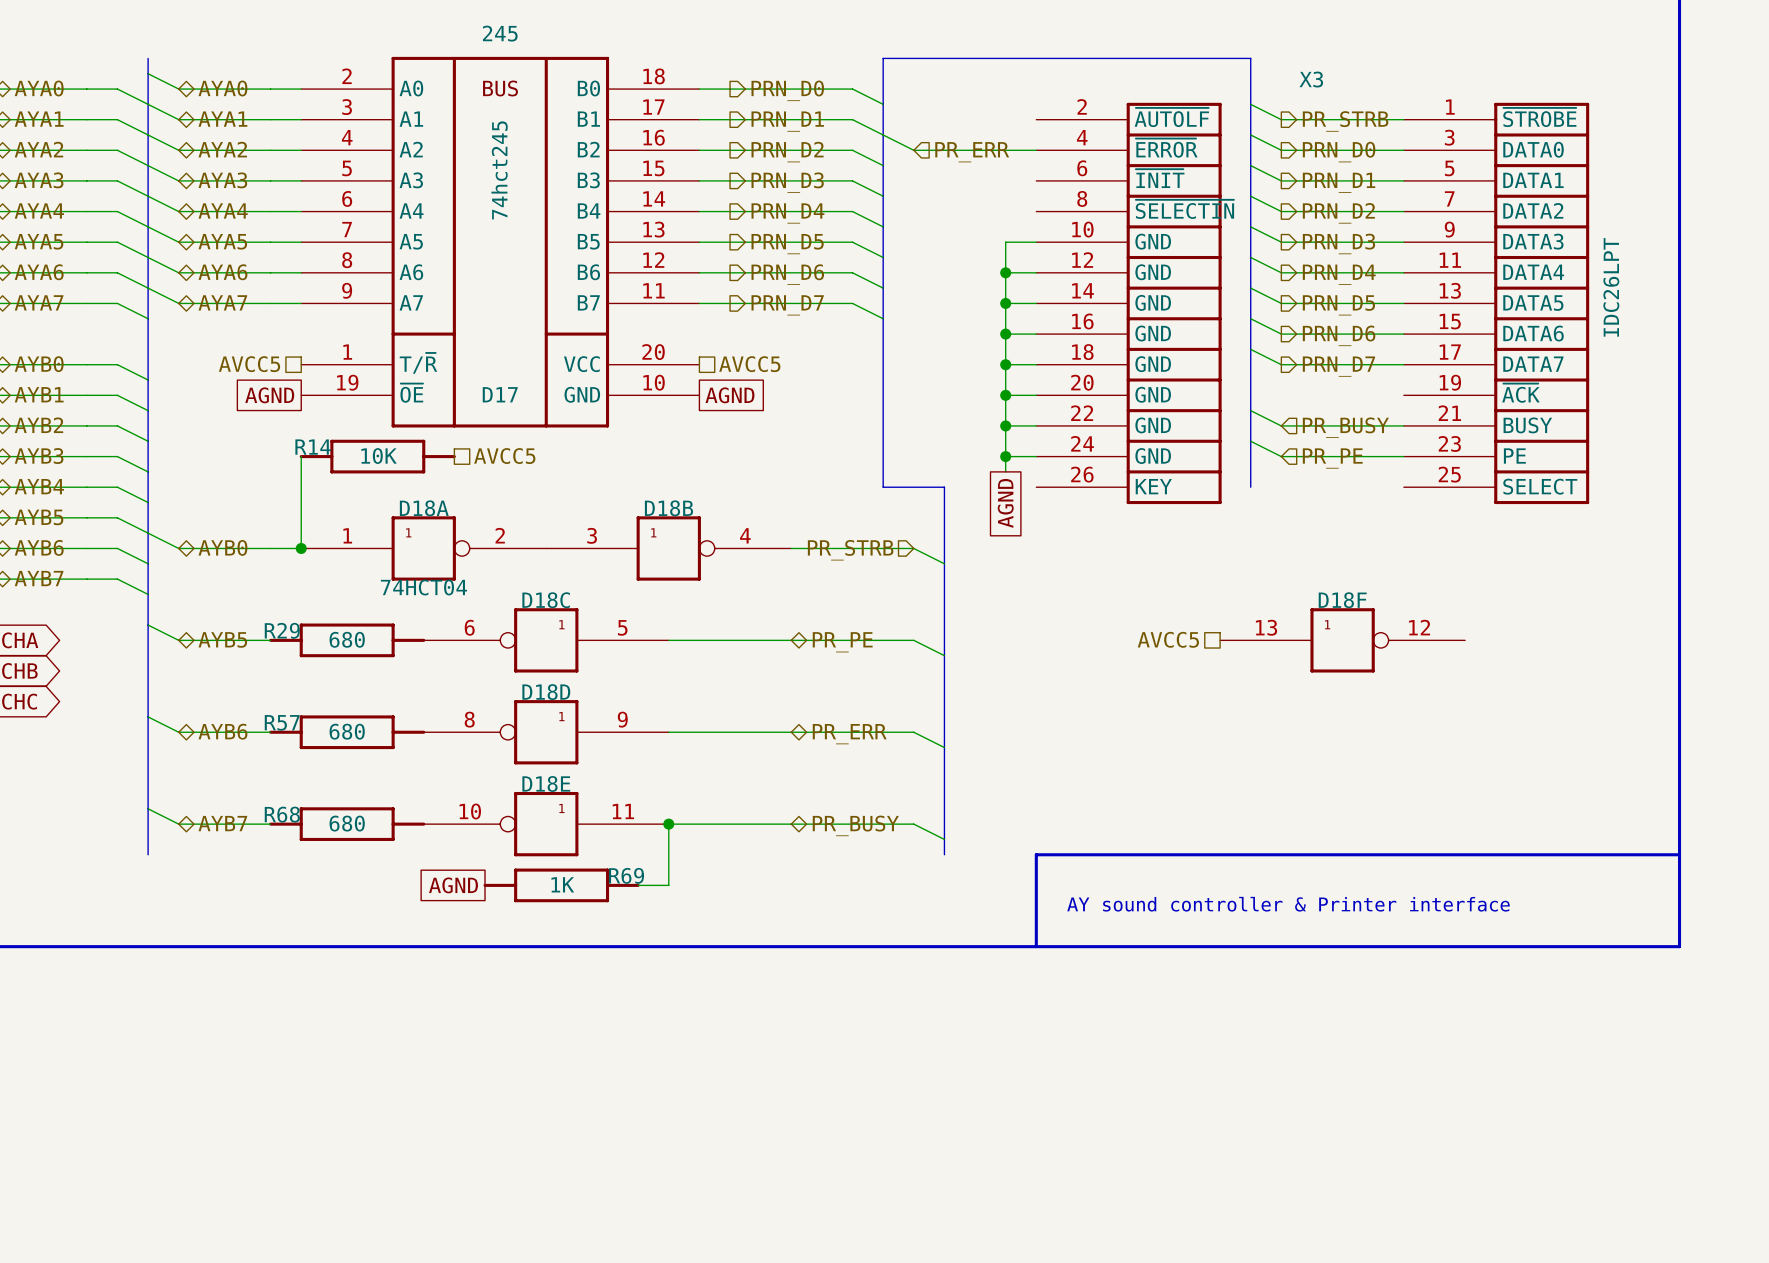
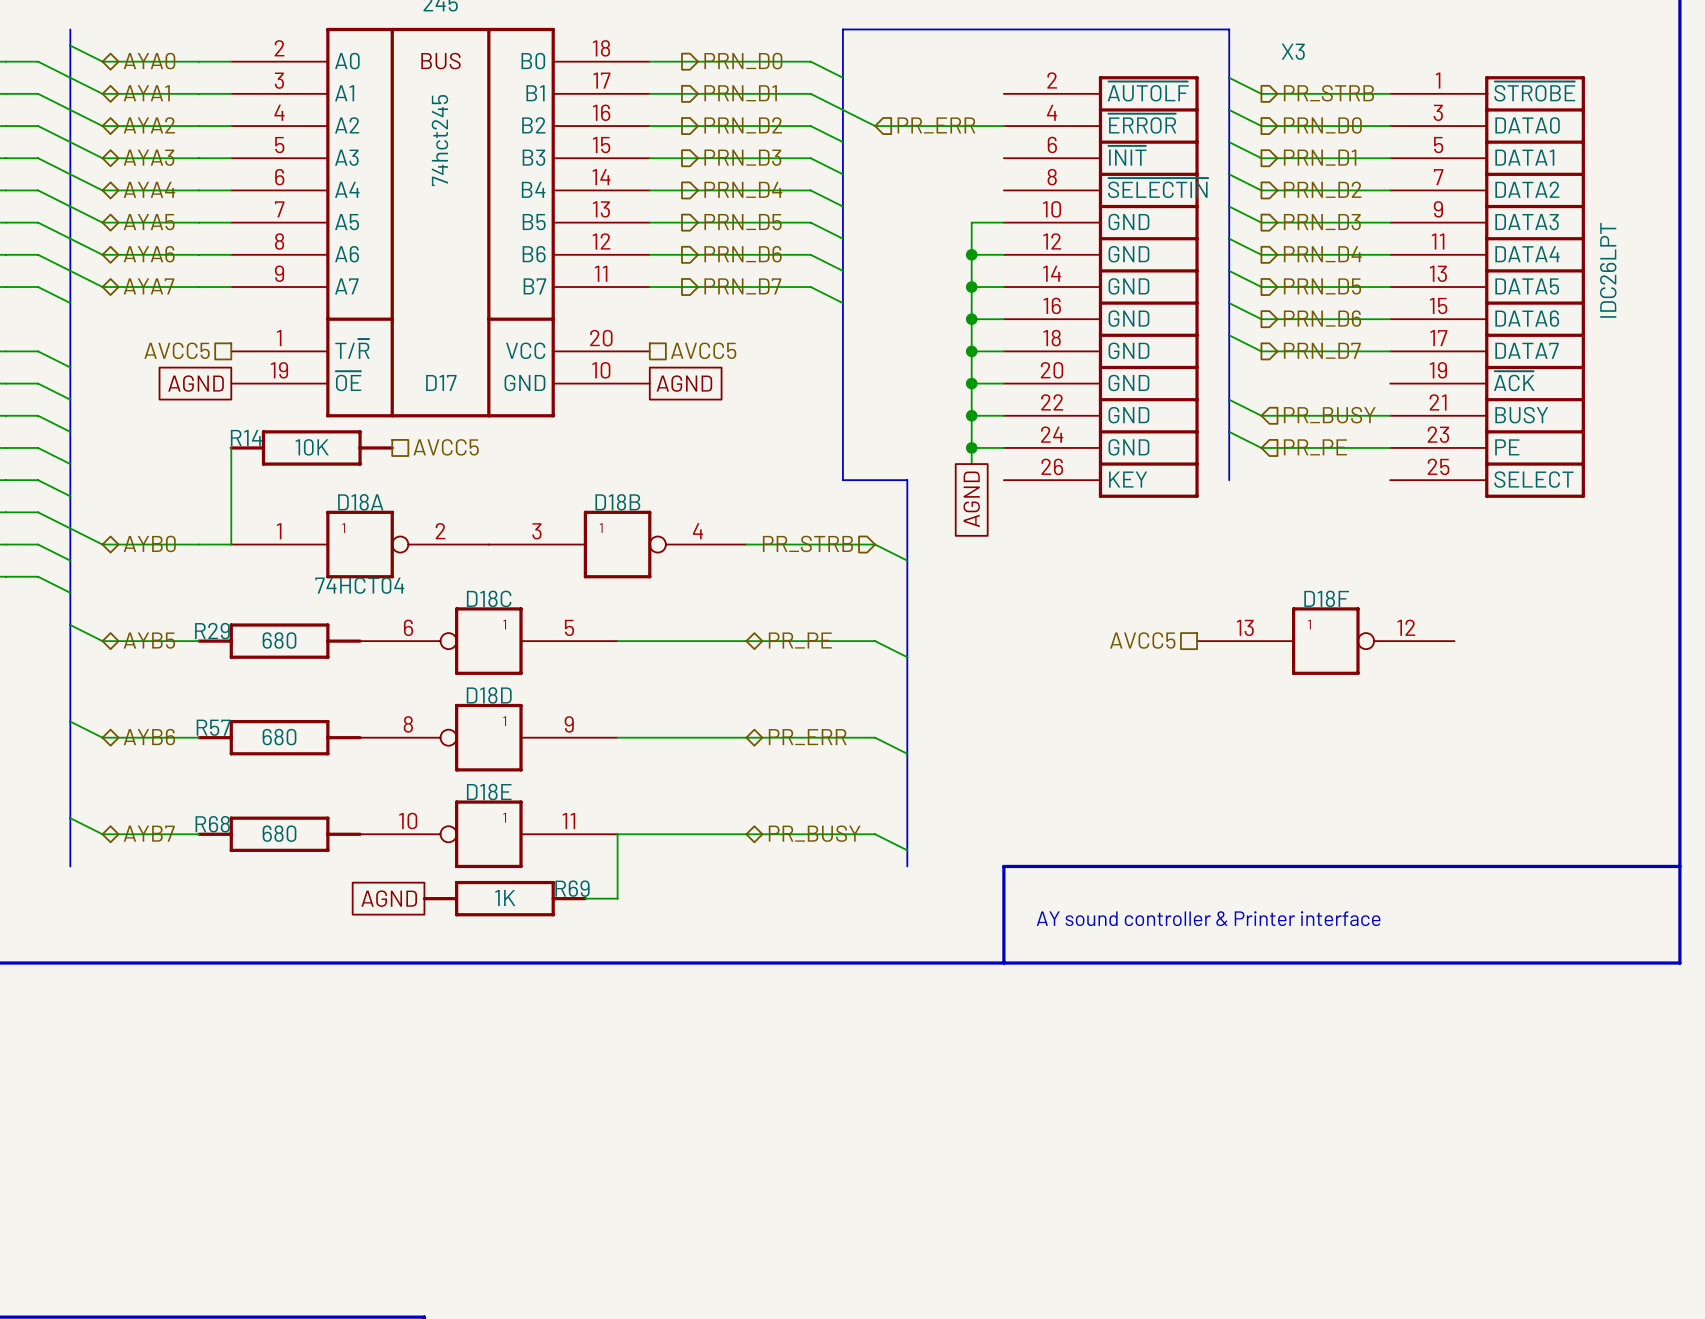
junction: (301, 548) -> none
junction: (668, 824) -> none

